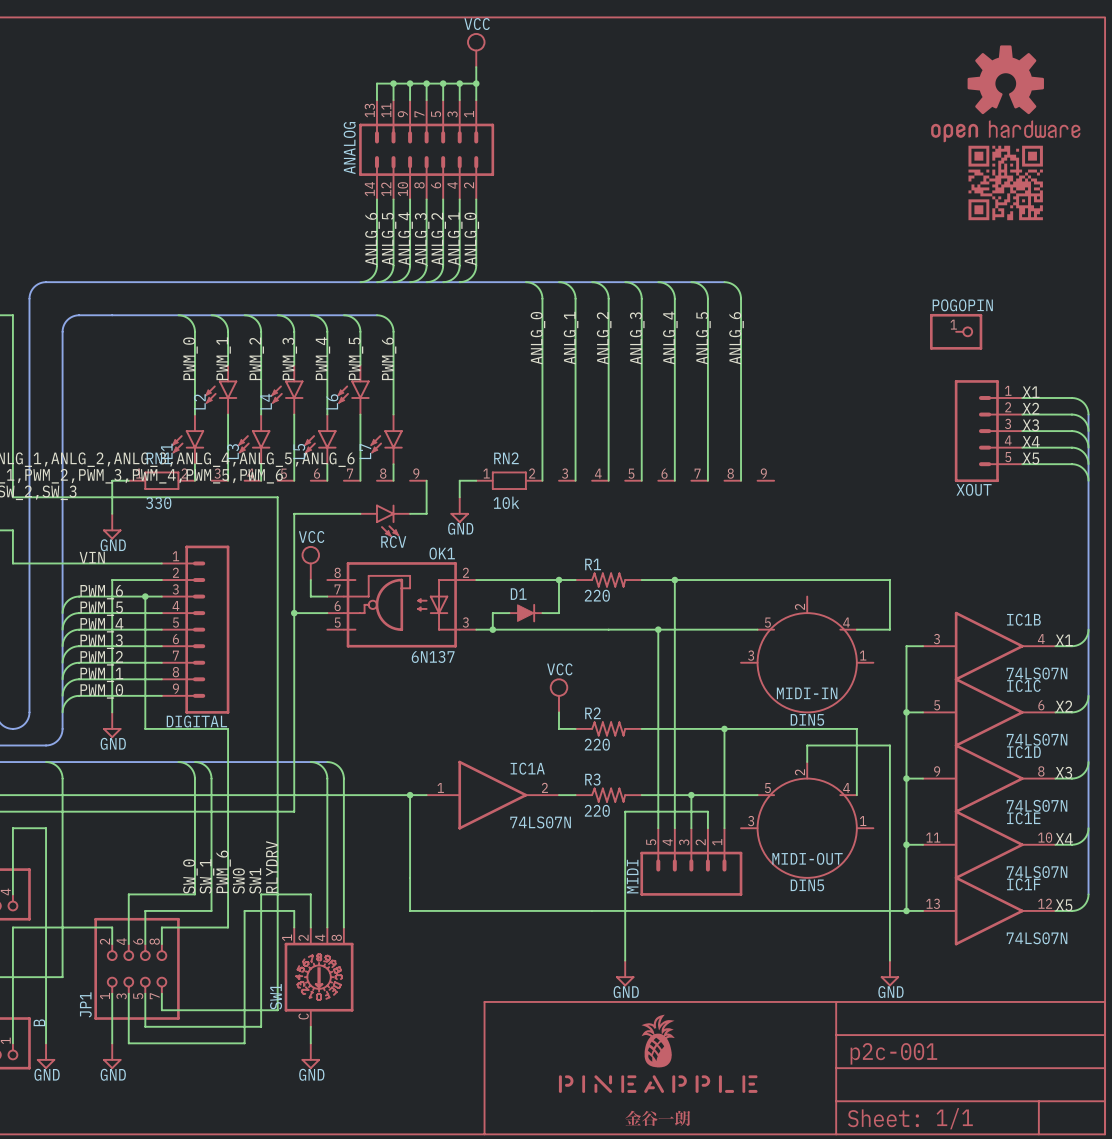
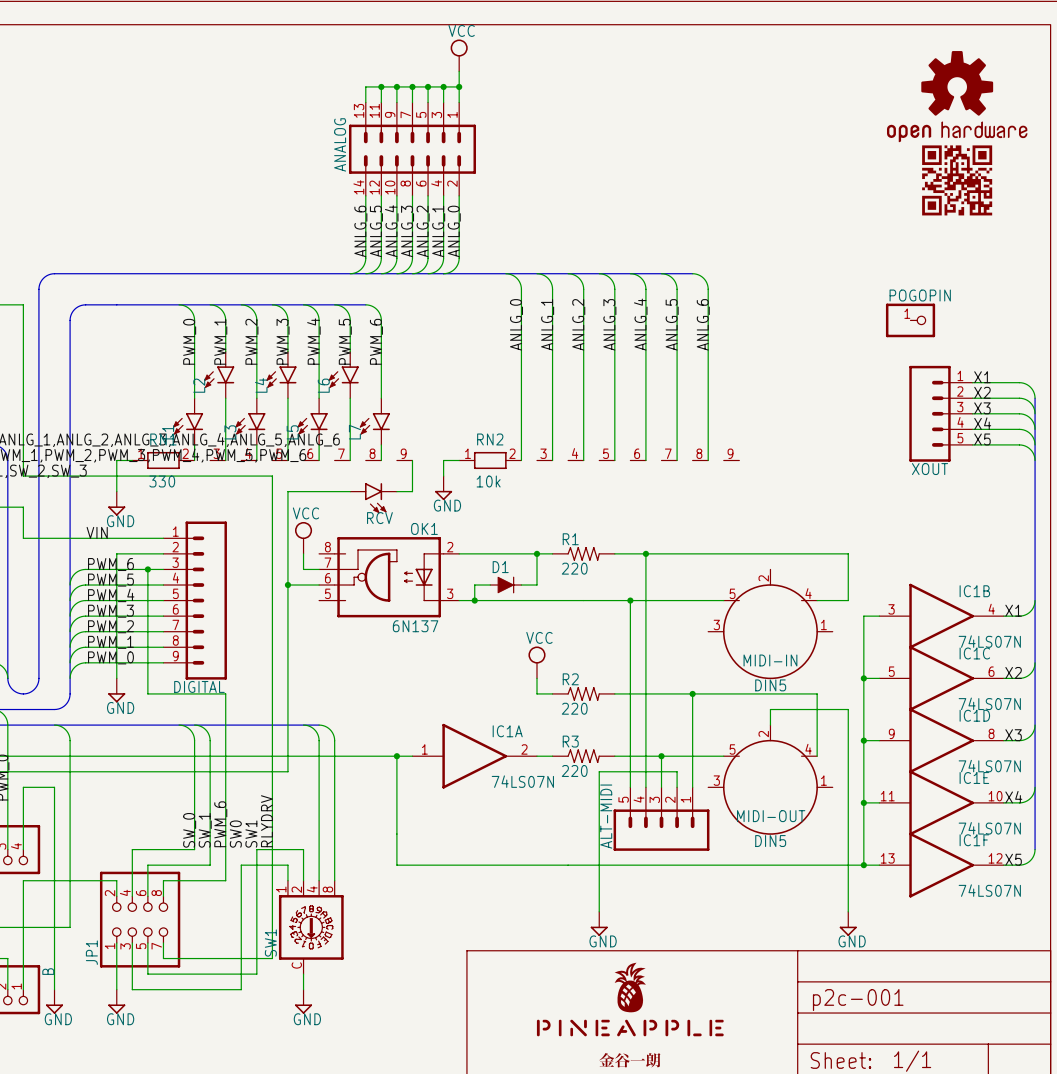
MIDI name: MIDI (632, 876) -> ALT-MIDI (606, 816)

